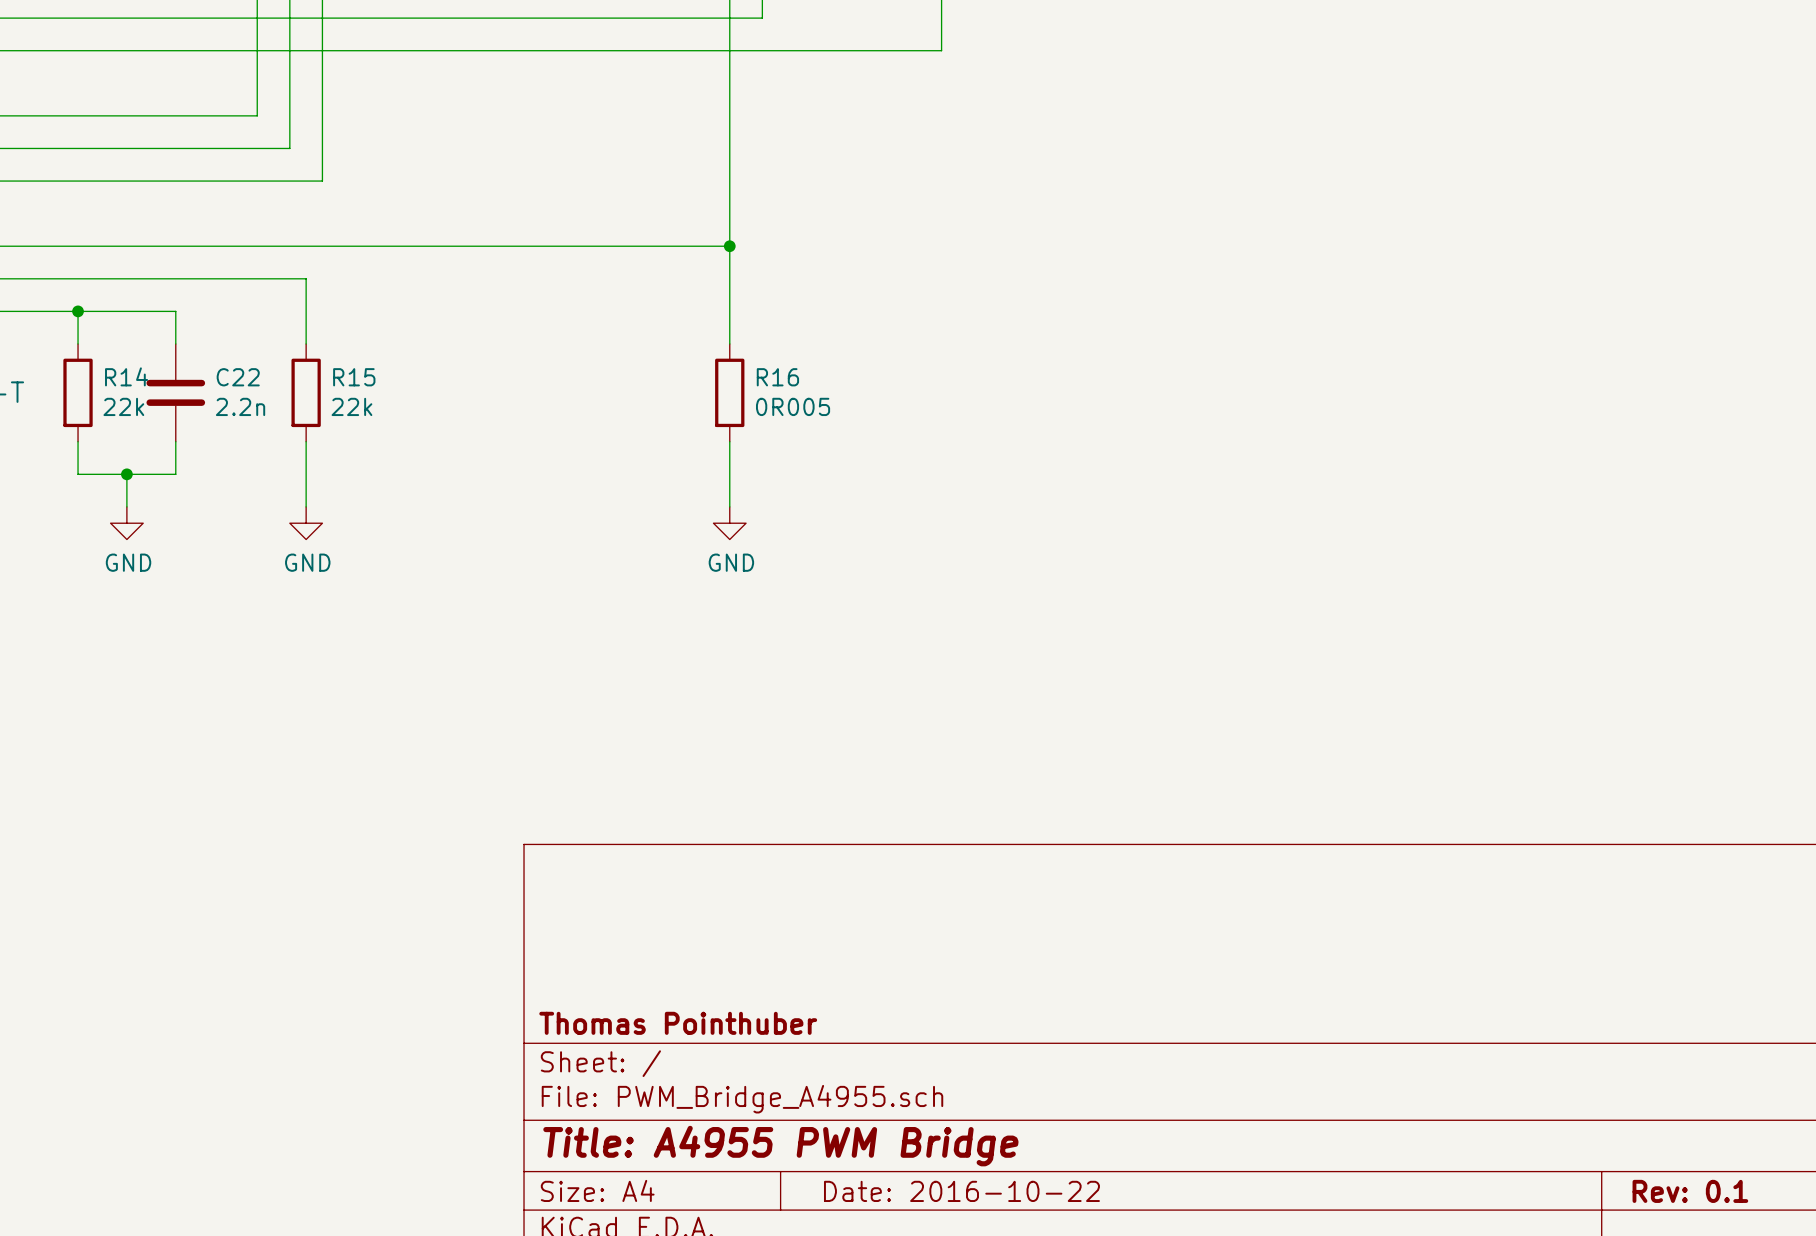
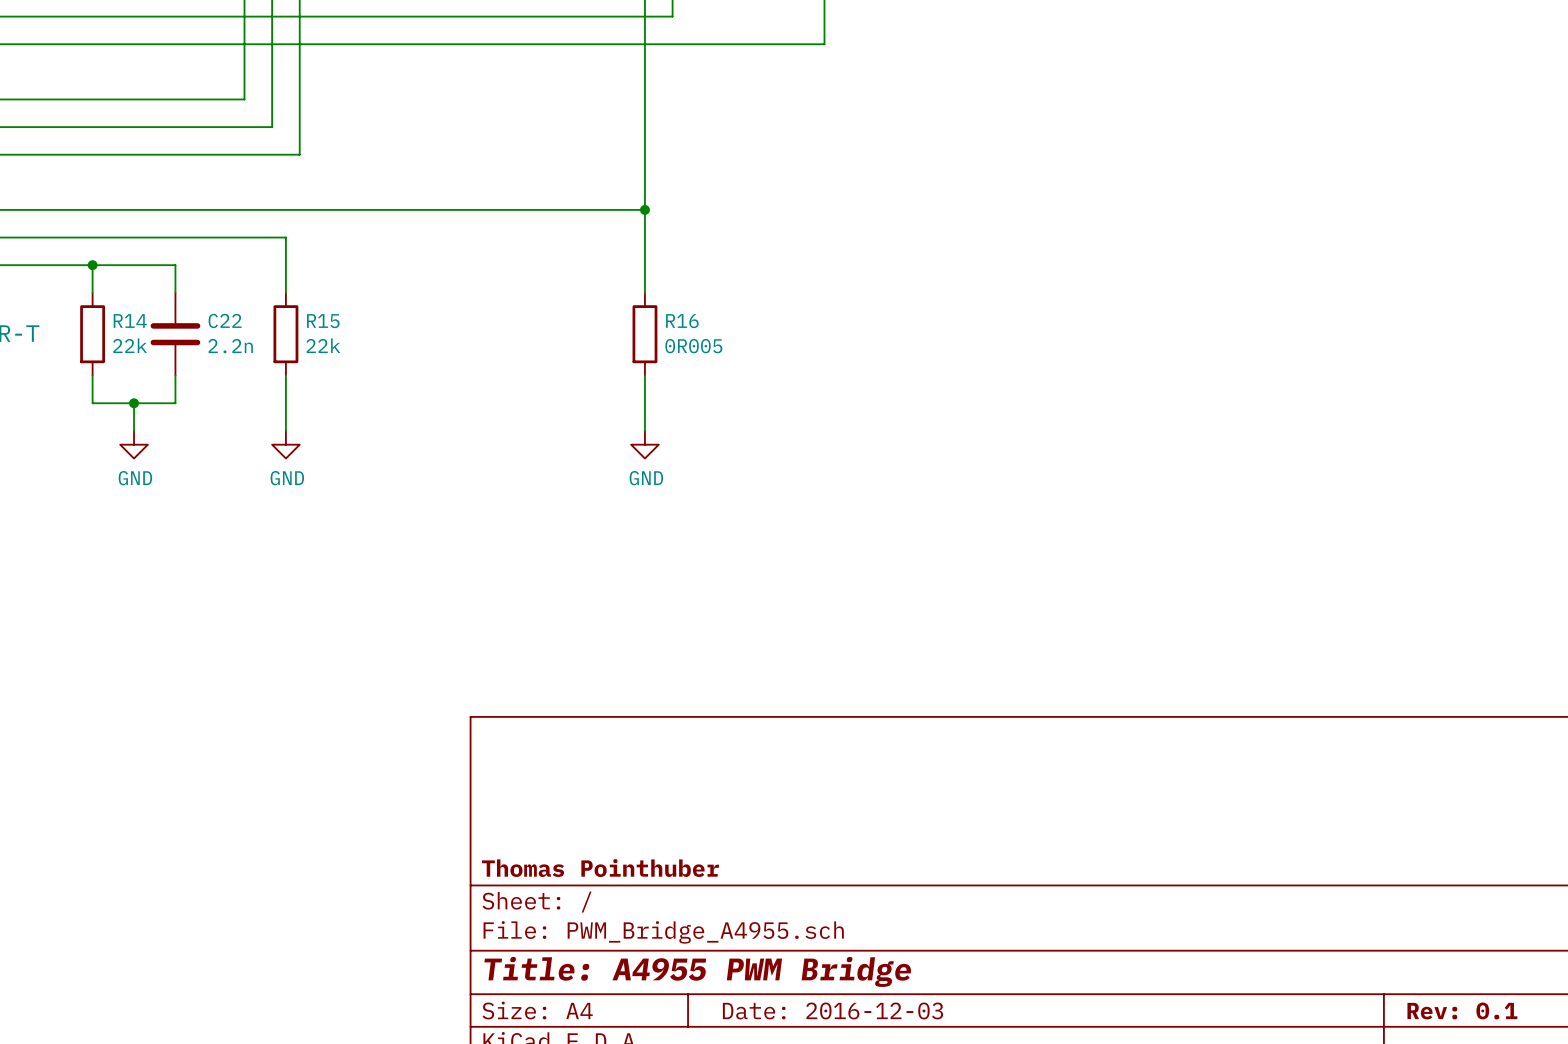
title block: Date: 2016-10-22 (961, 1191) -> Date: 2016-12-03 (832, 1010)

